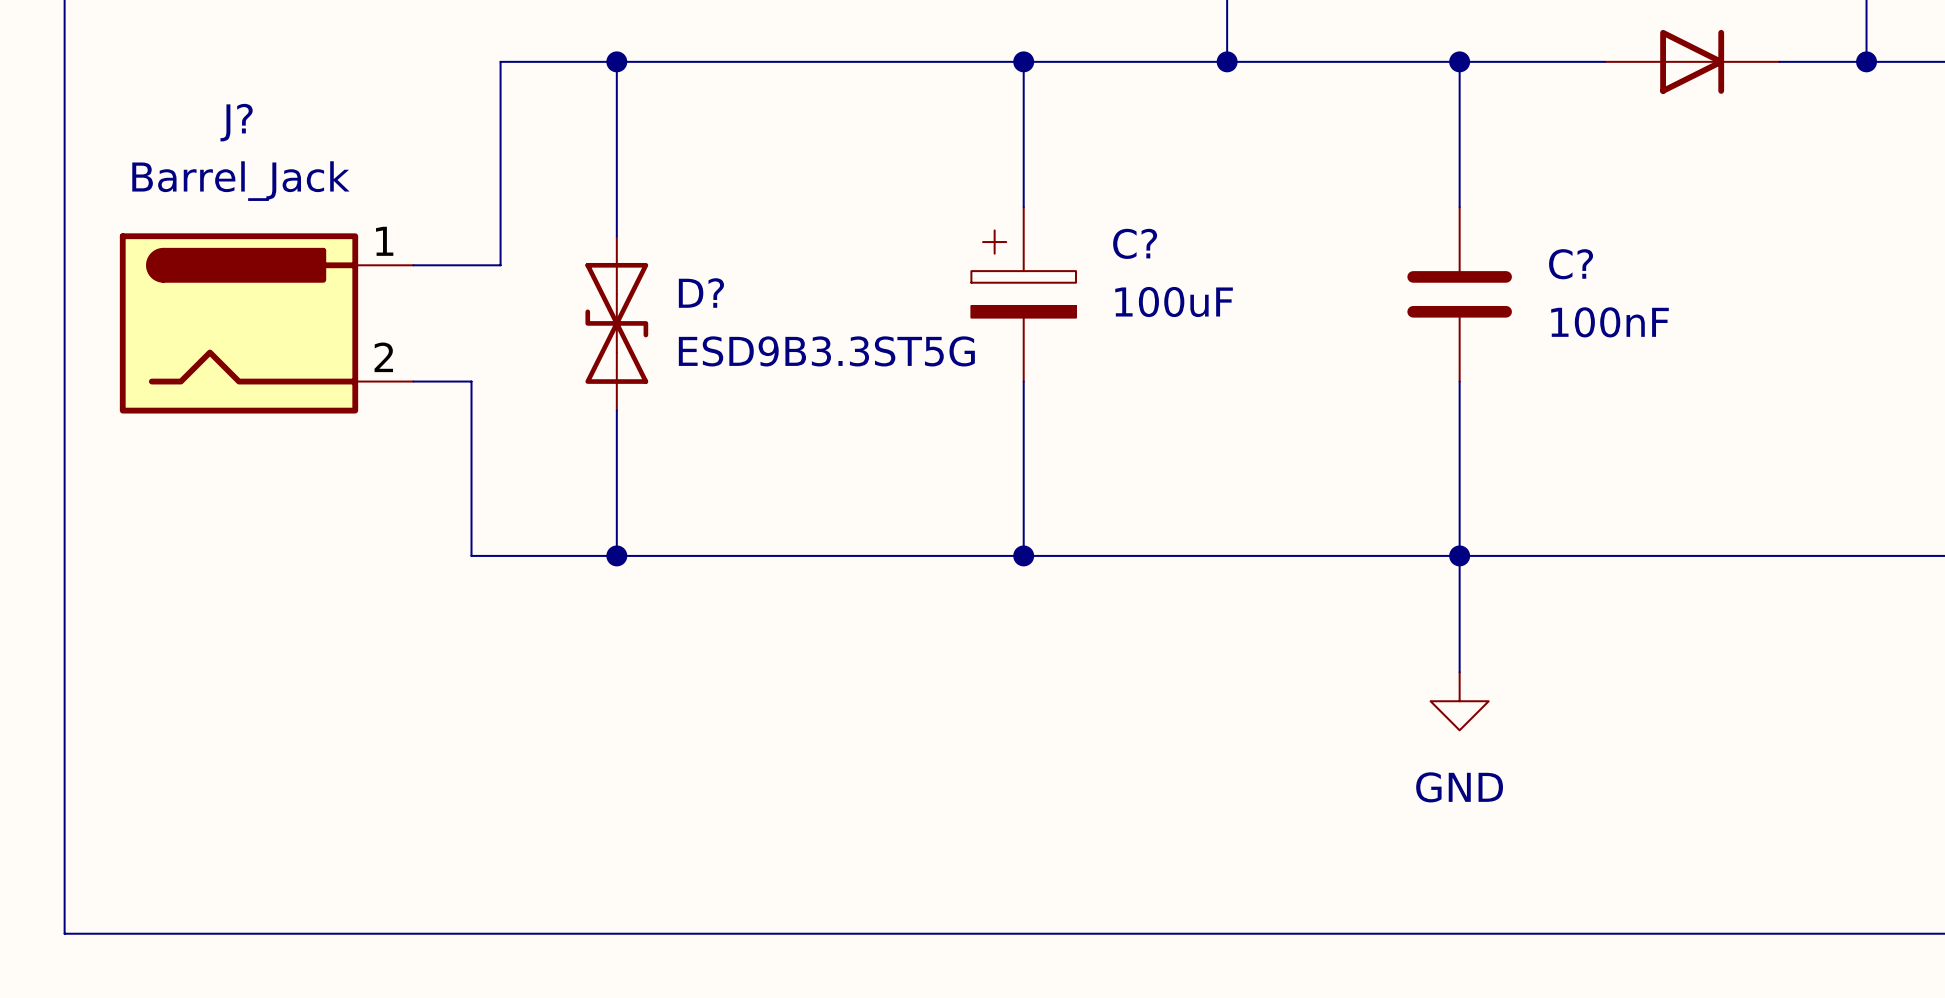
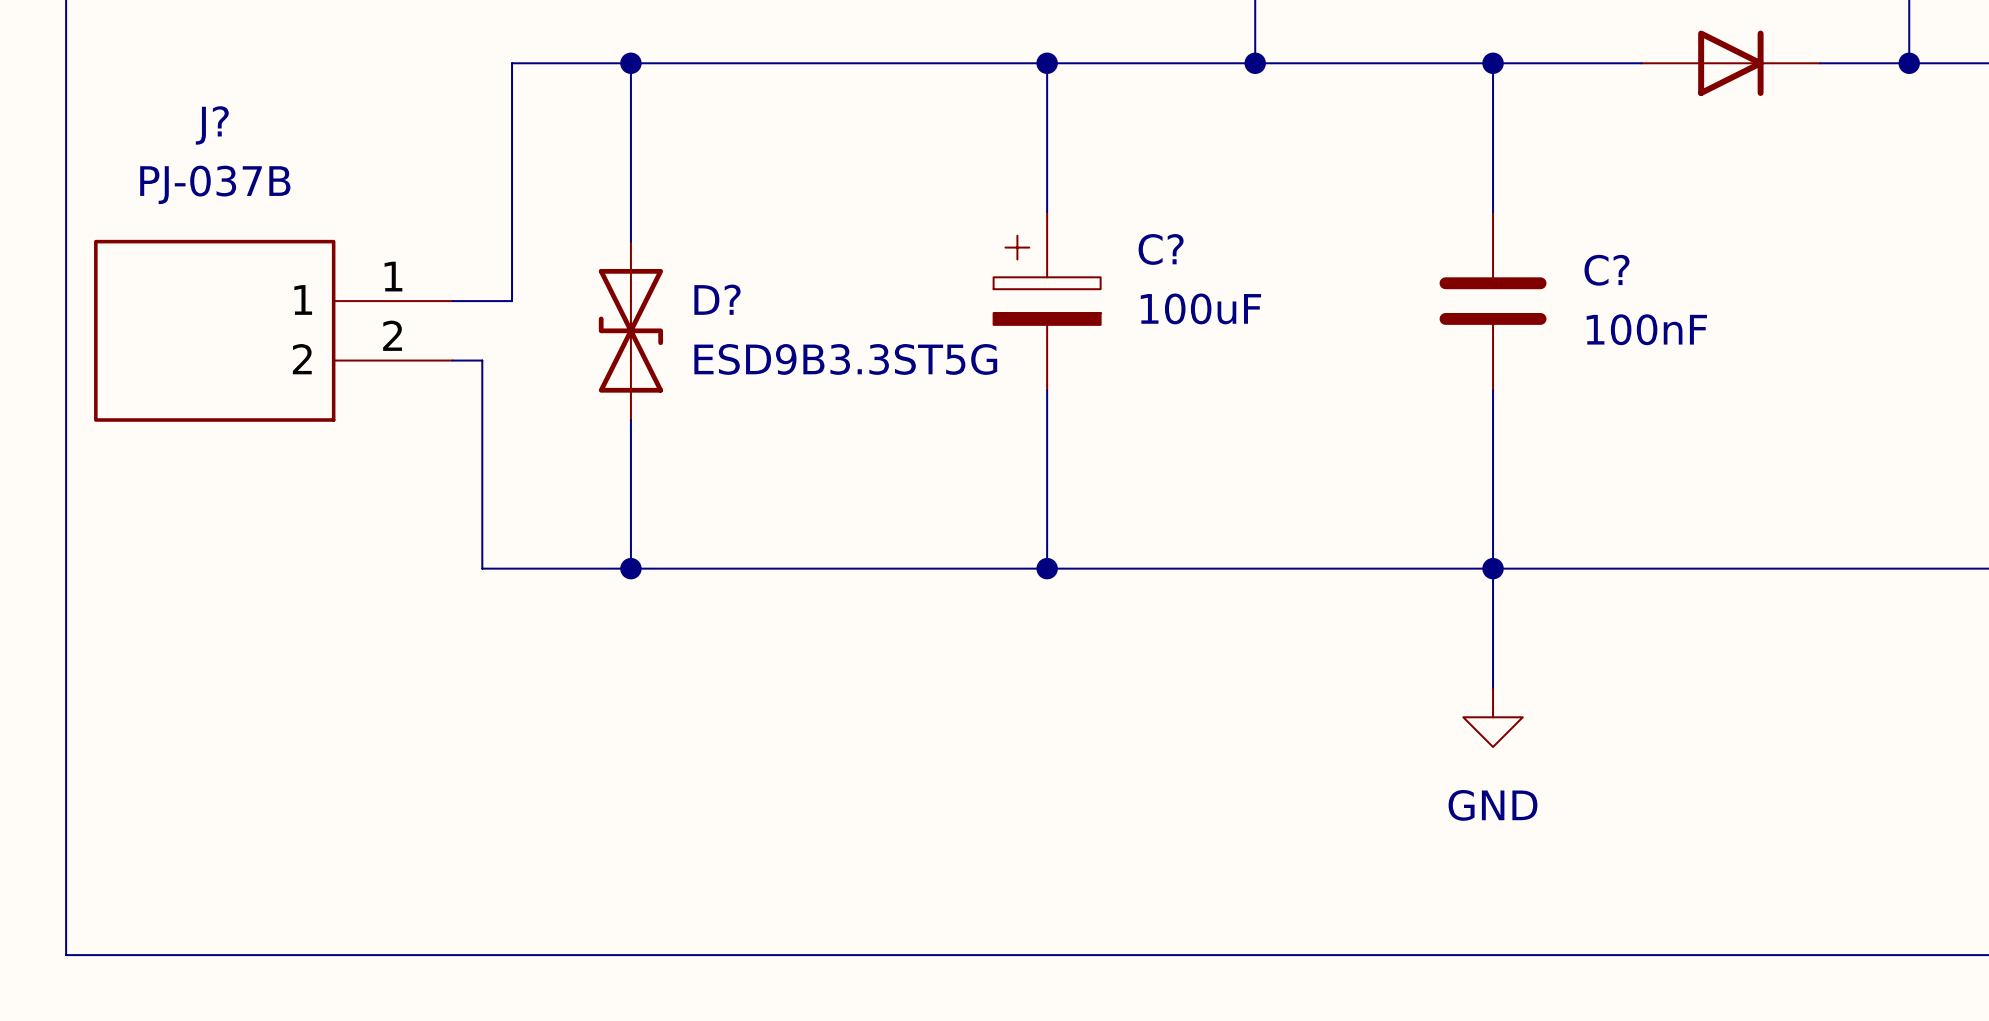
J? value: Barrel_Jack (240, 181) -> PJ-037B (215, 184)
J? symbol: [119, 233, 414, 414] -> [94, 239, 453, 422]
wire: (413, 265) (500, 265) -> (452, 301) (512, 301) (512, 271)
wire: (413, 381) (471, 381) -> (452, 360) (482, 360) (482, 390)

